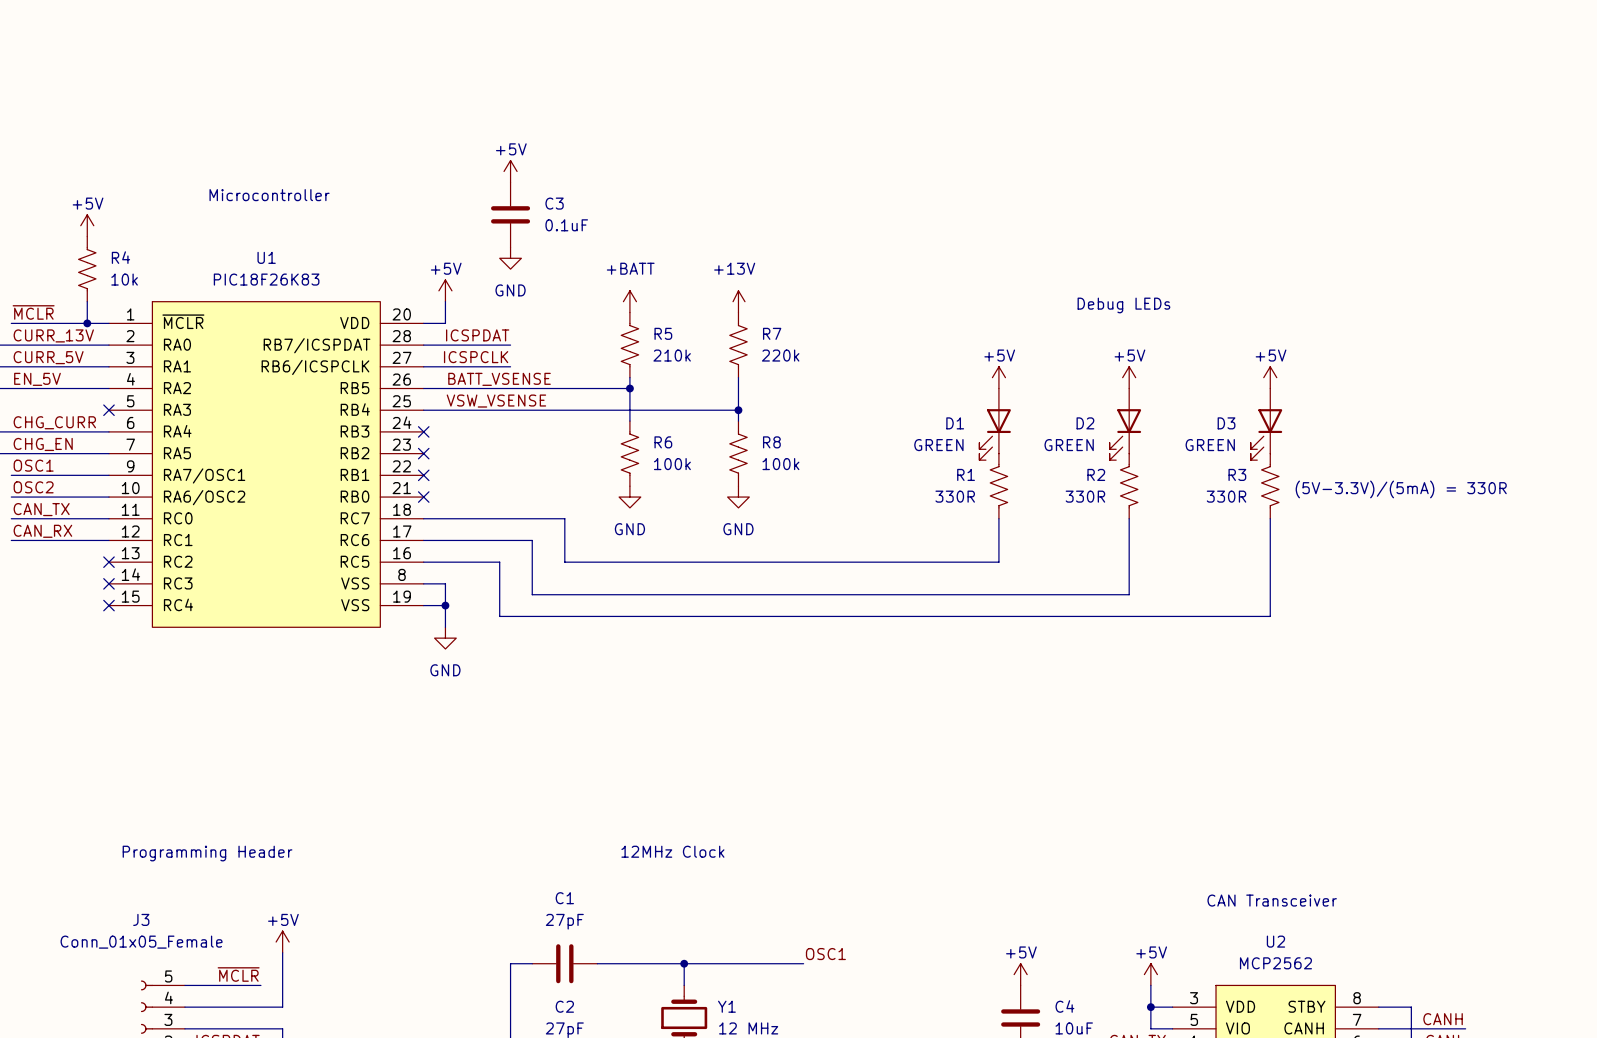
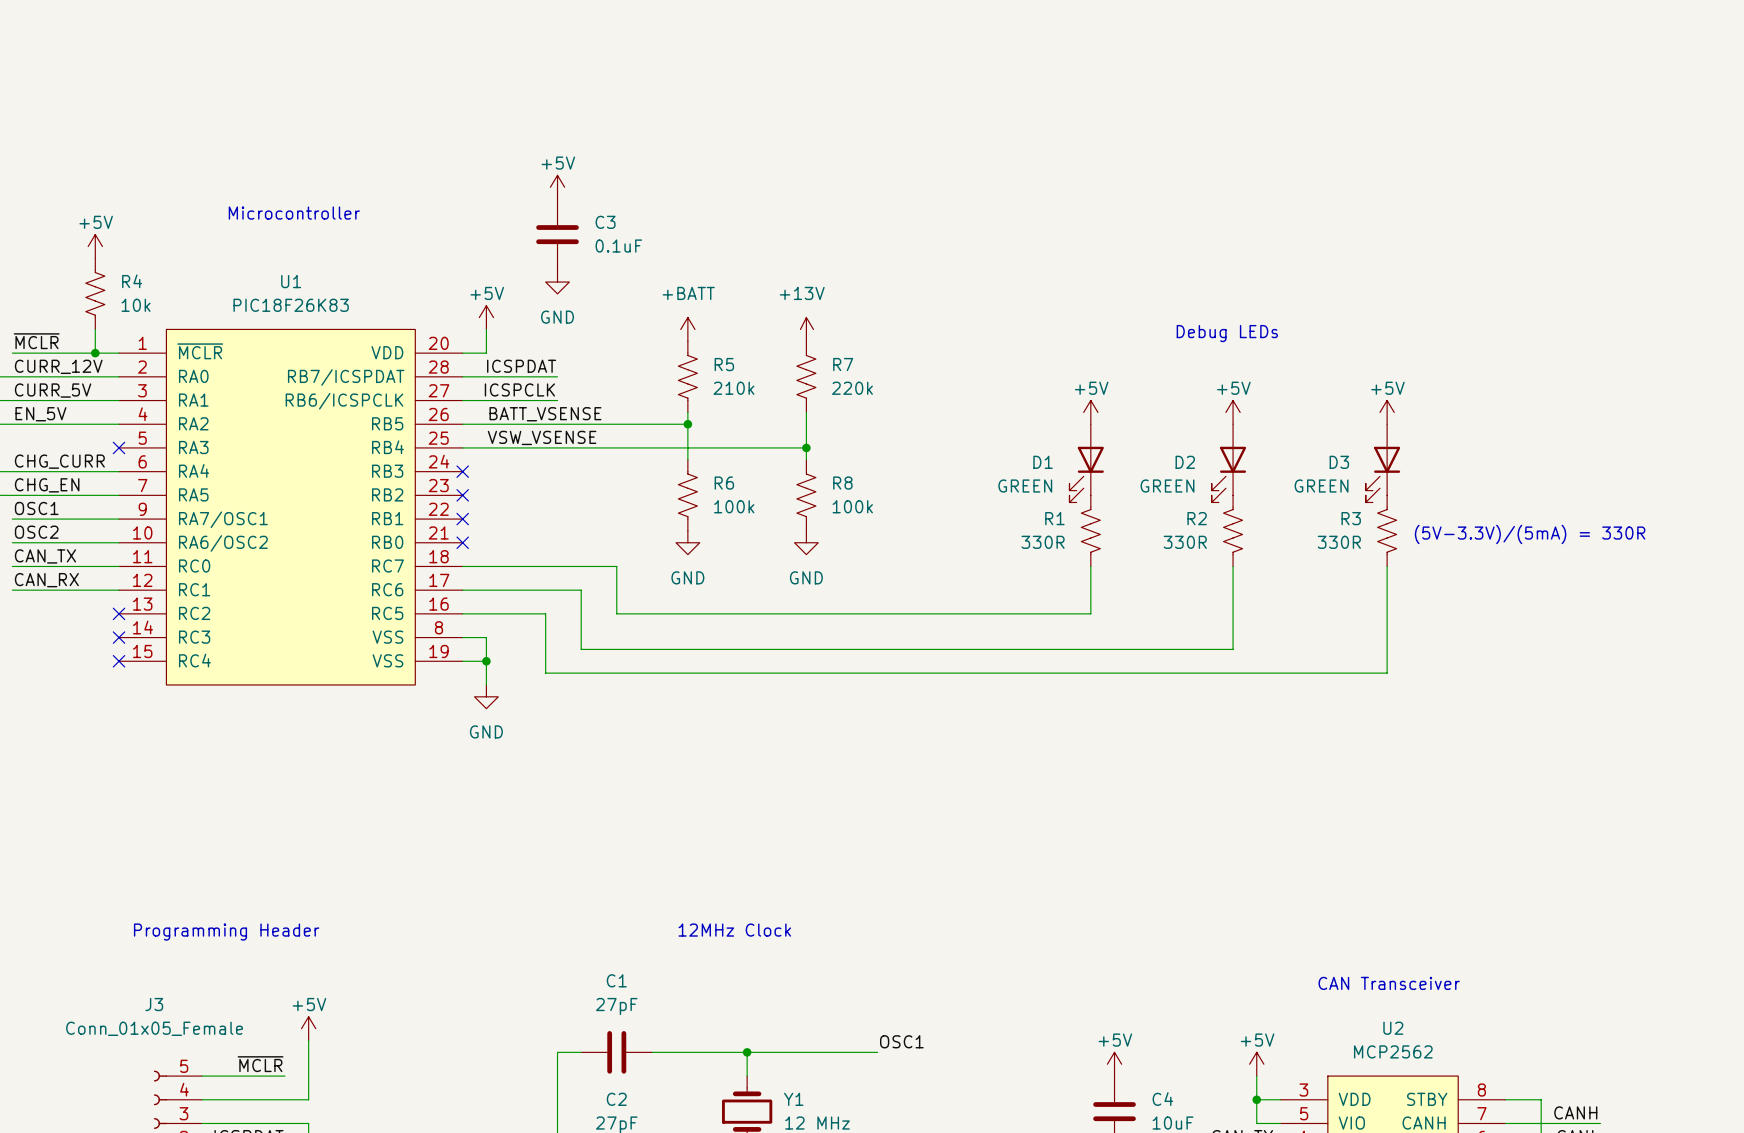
label: CURR_13V (53, 335) -> CURR_12V (58, 366)

